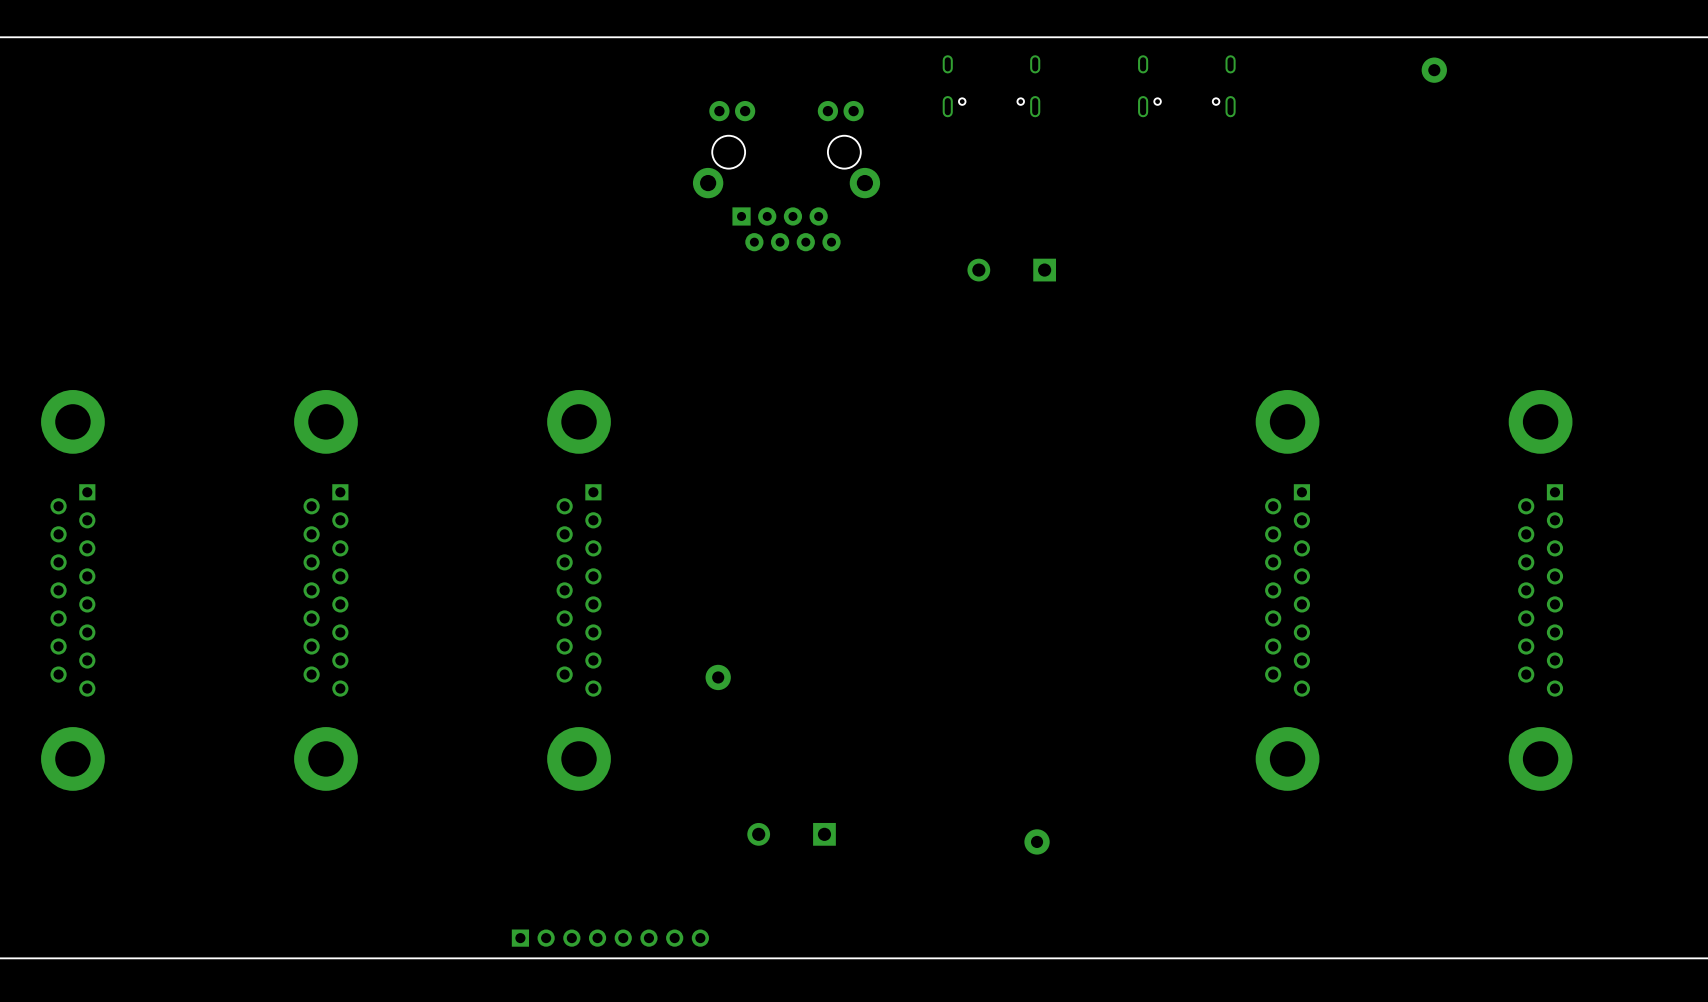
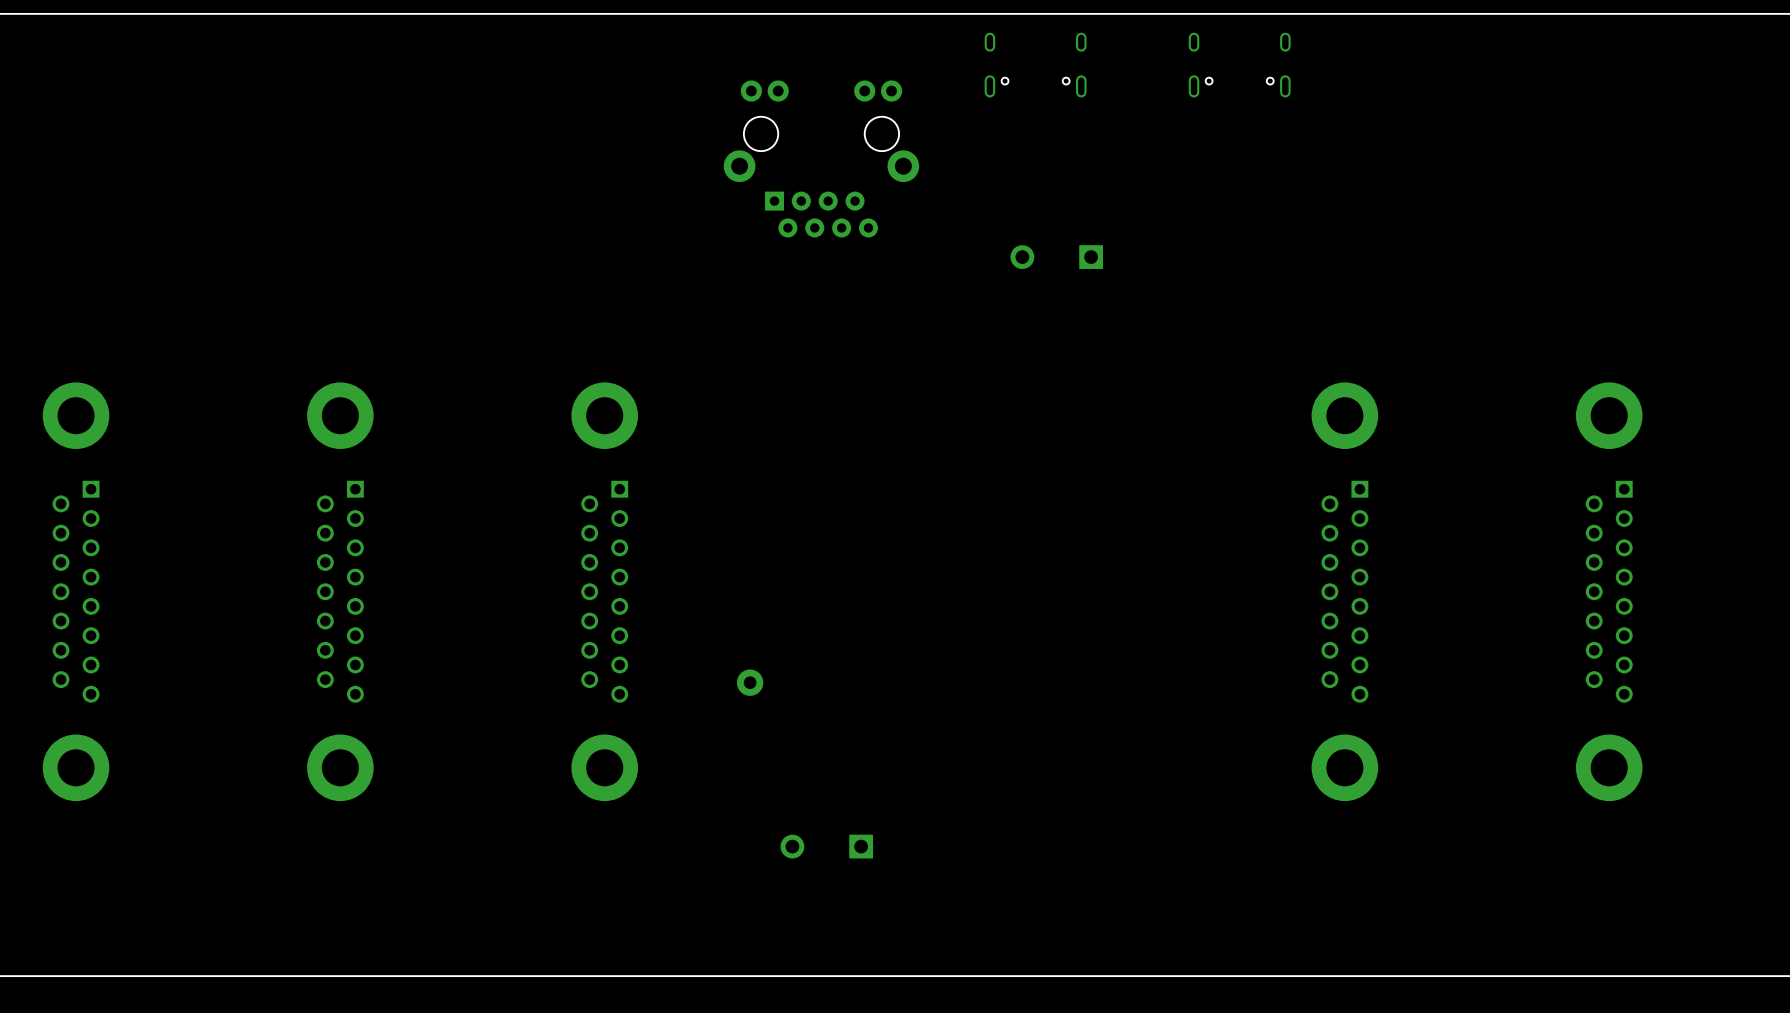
part: (1434, 70) -> none
part: (1037, 841) -> none
part: (610, 938) -> none

